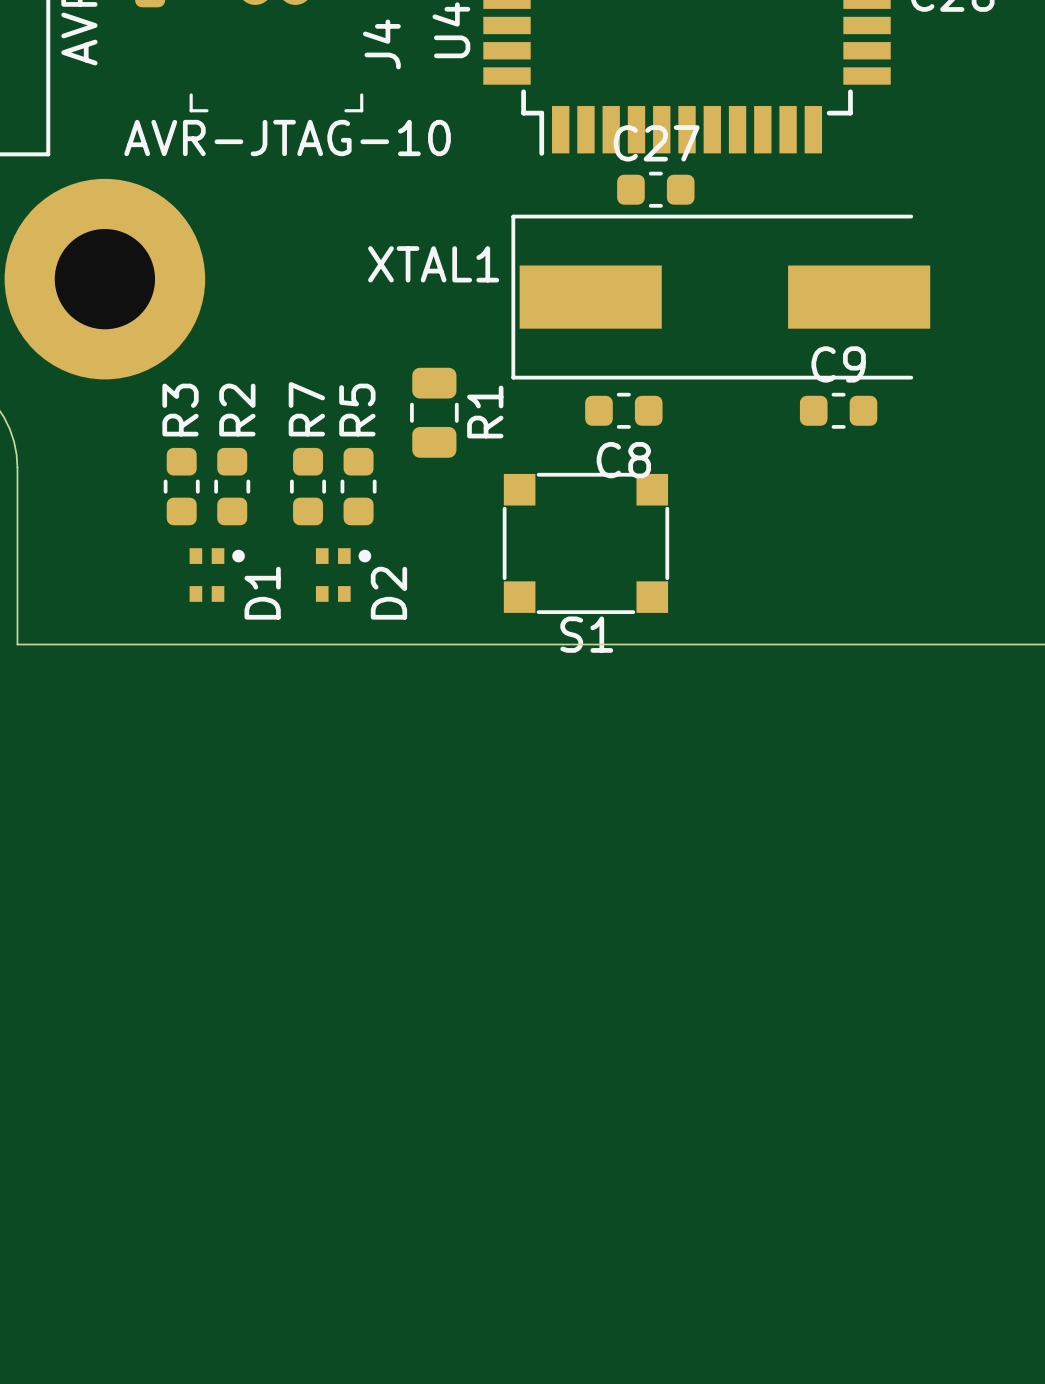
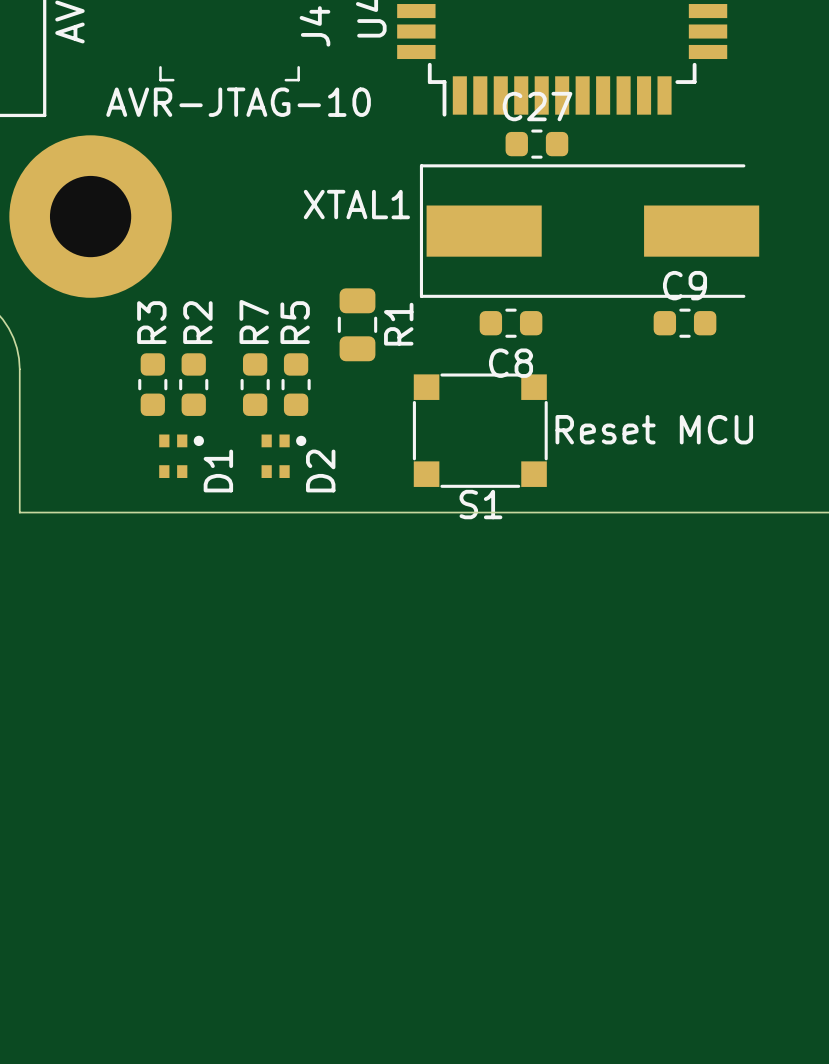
text: none -> Reset MCU (654, 429)

